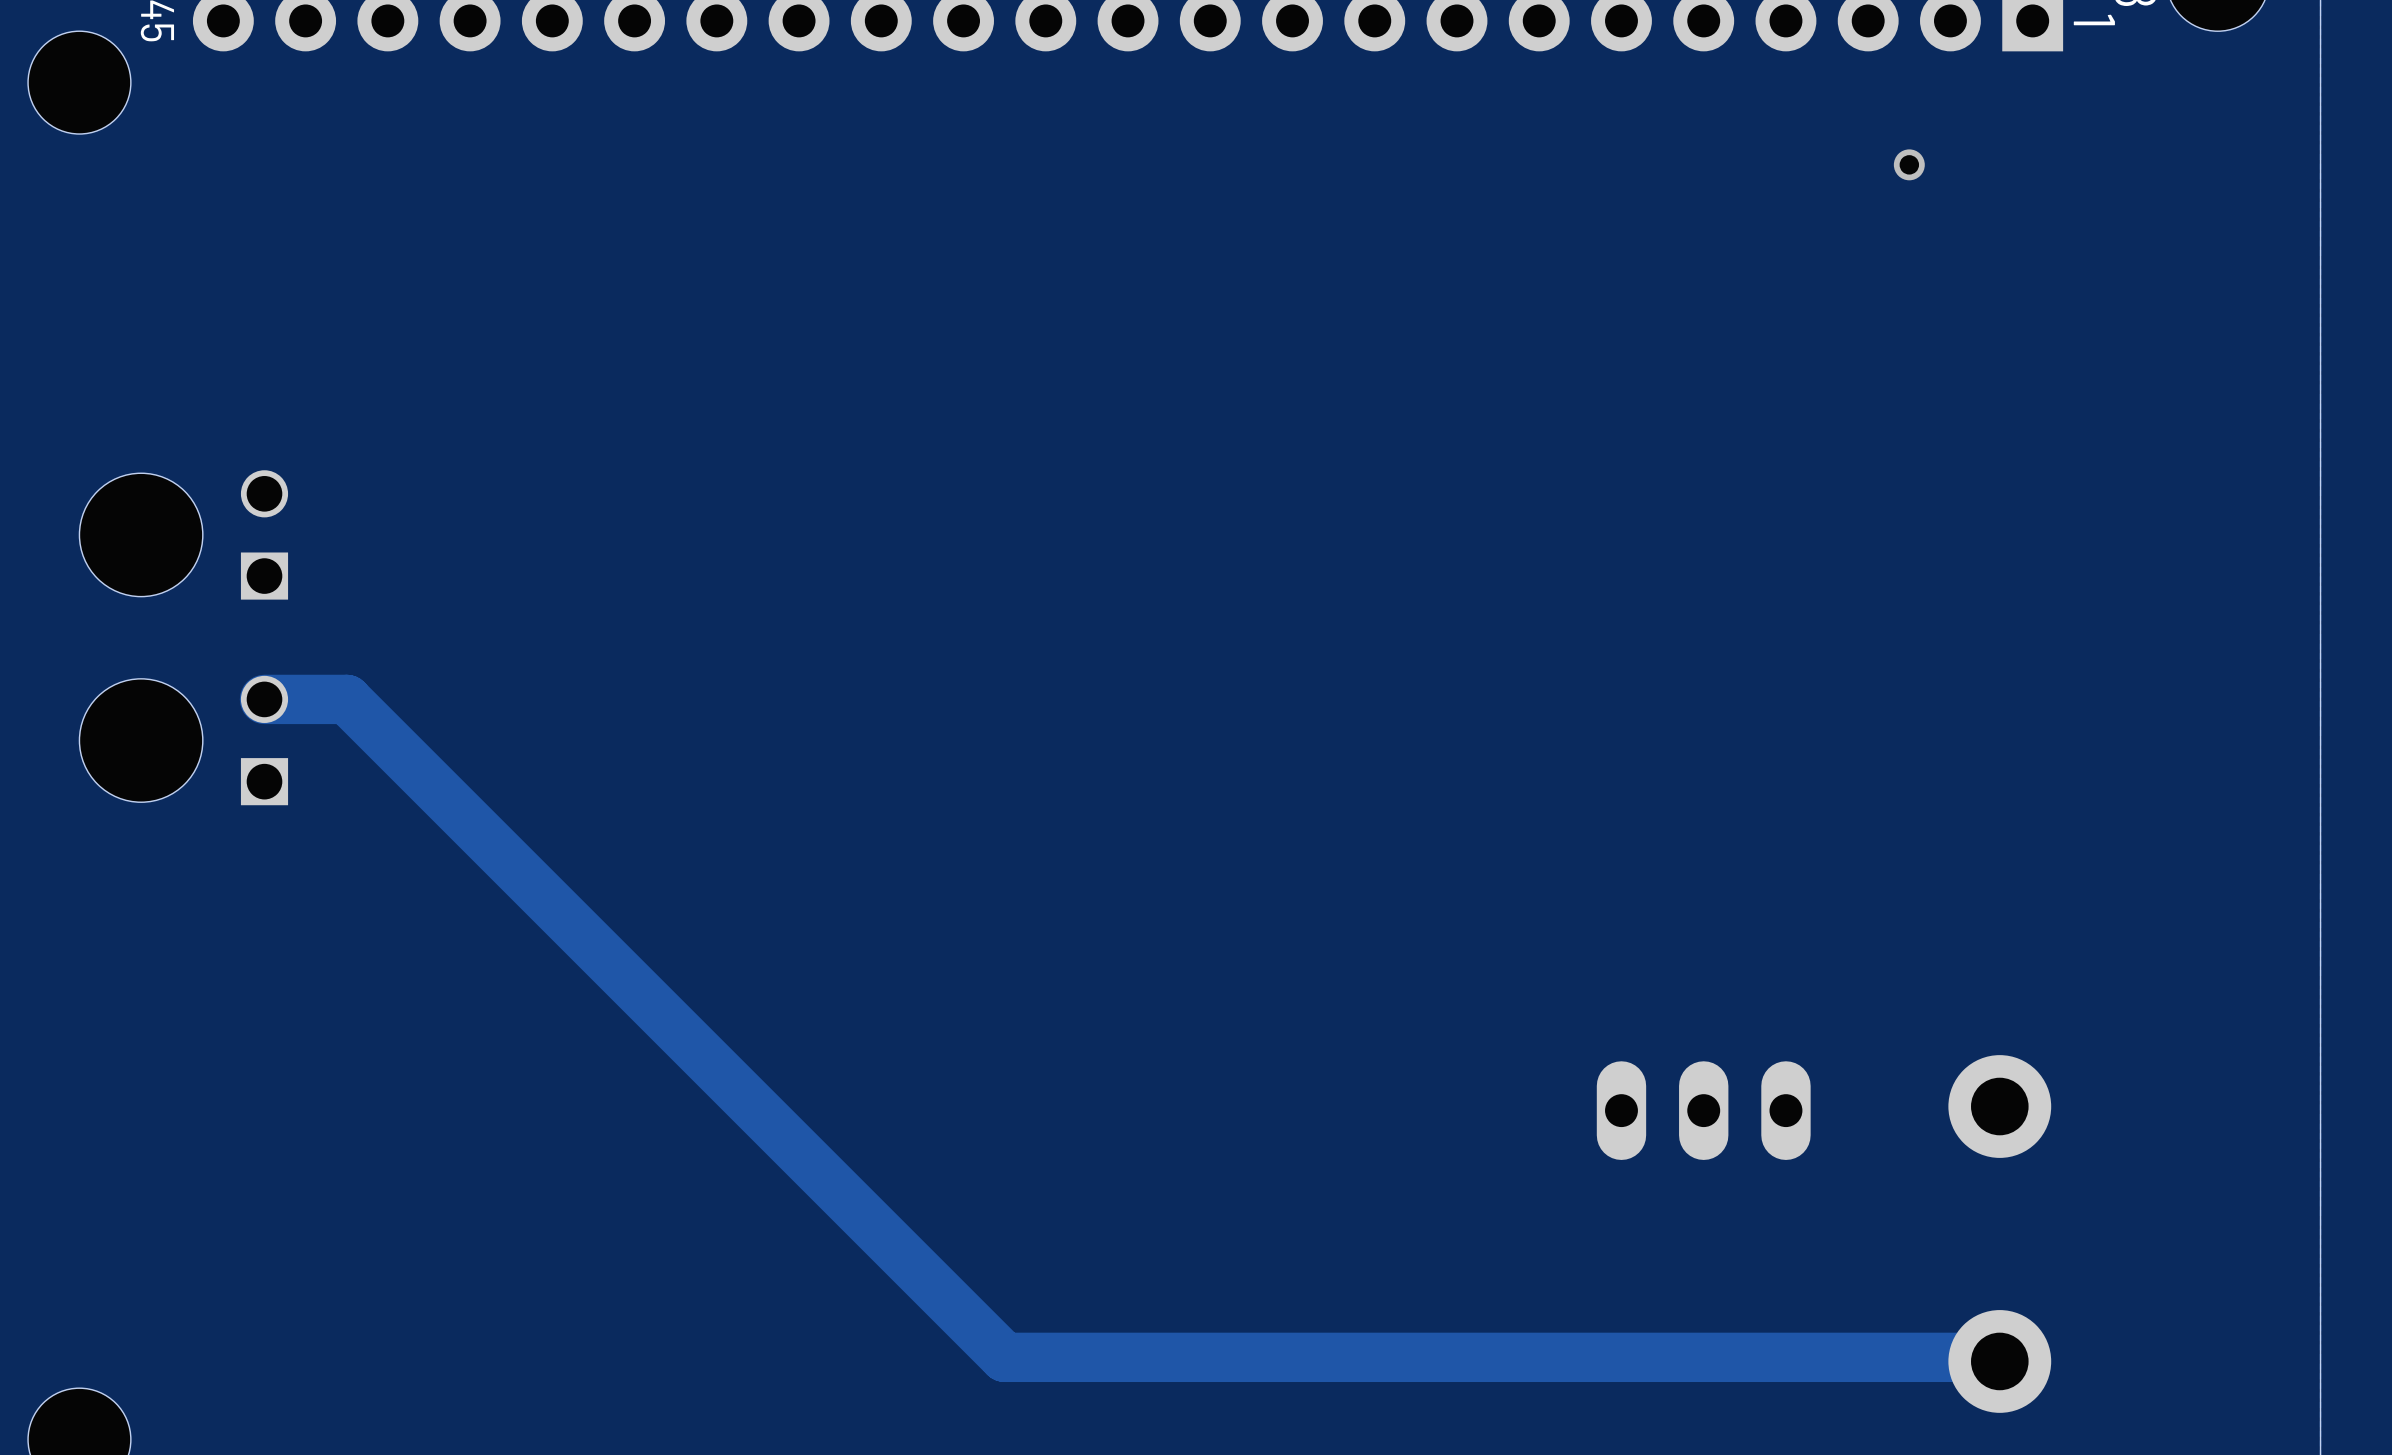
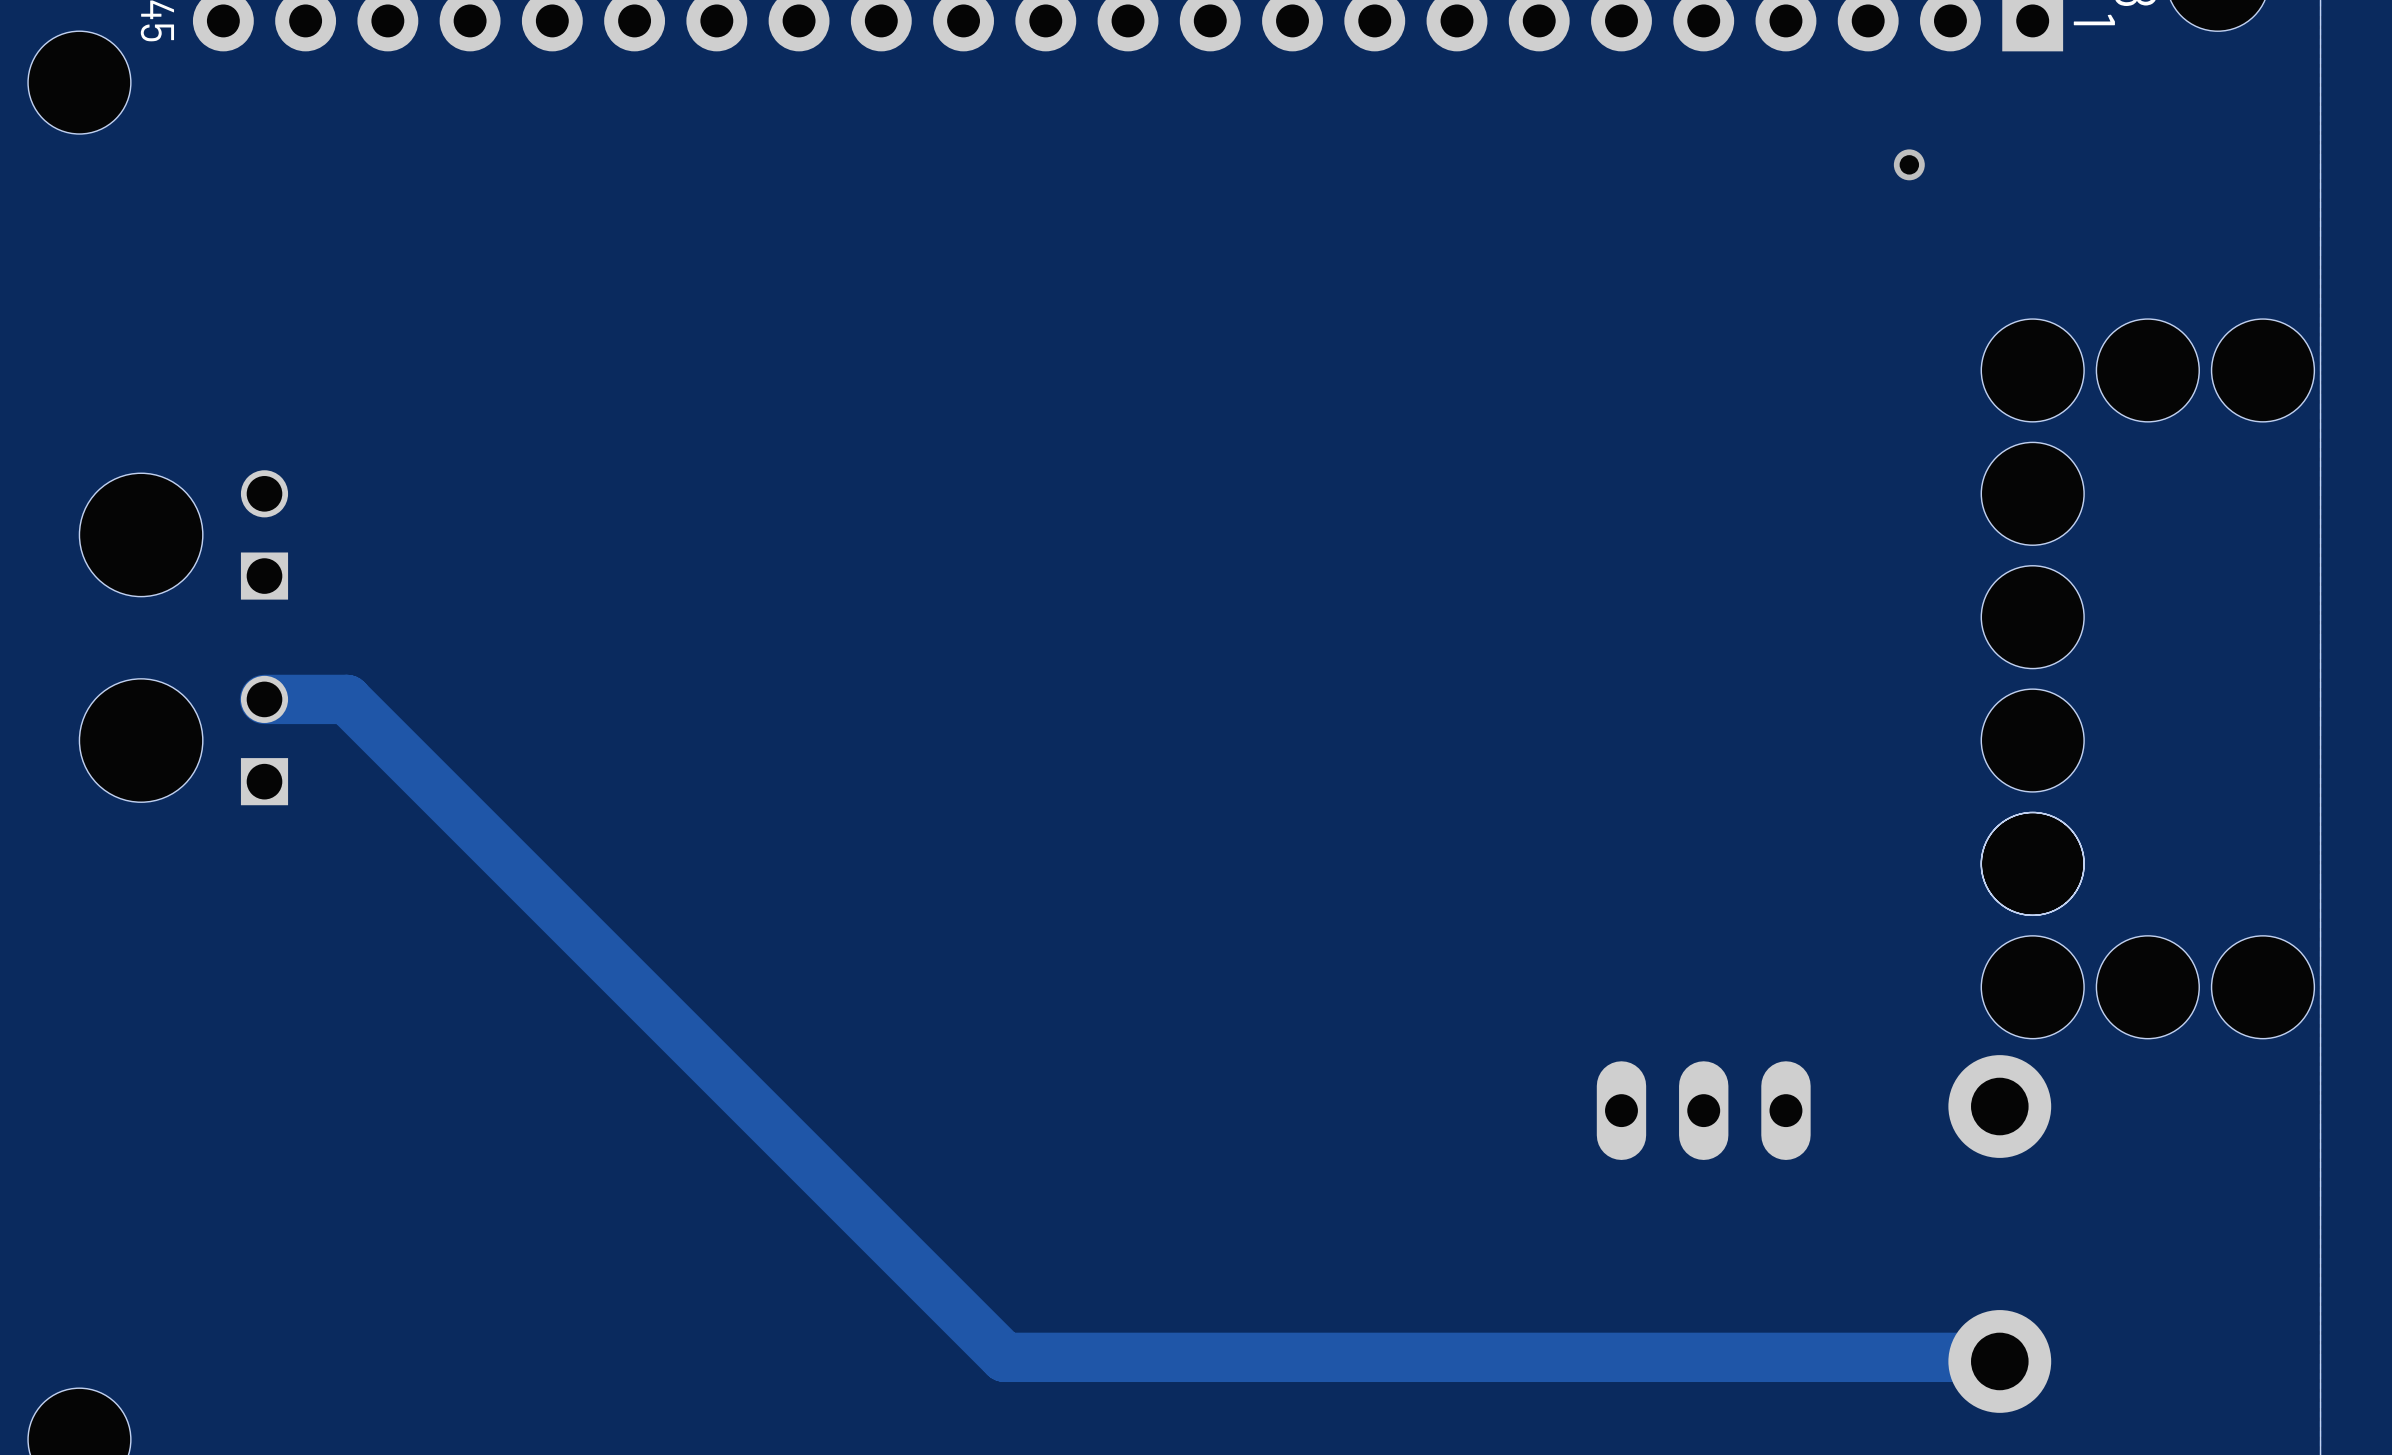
hole: none -> (2032, 370)
hole: none -> (2147, 370)
hole: none -> (2262, 370)
hole: none -> (2032, 493)
hole: none -> (2032, 617)
hole: none -> (2032, 740)
hole: none -> (2032, 863)
hole: none -> (2032, 987)
hole: none -> (2147, 987)
hole: none -> (2262, 987)

